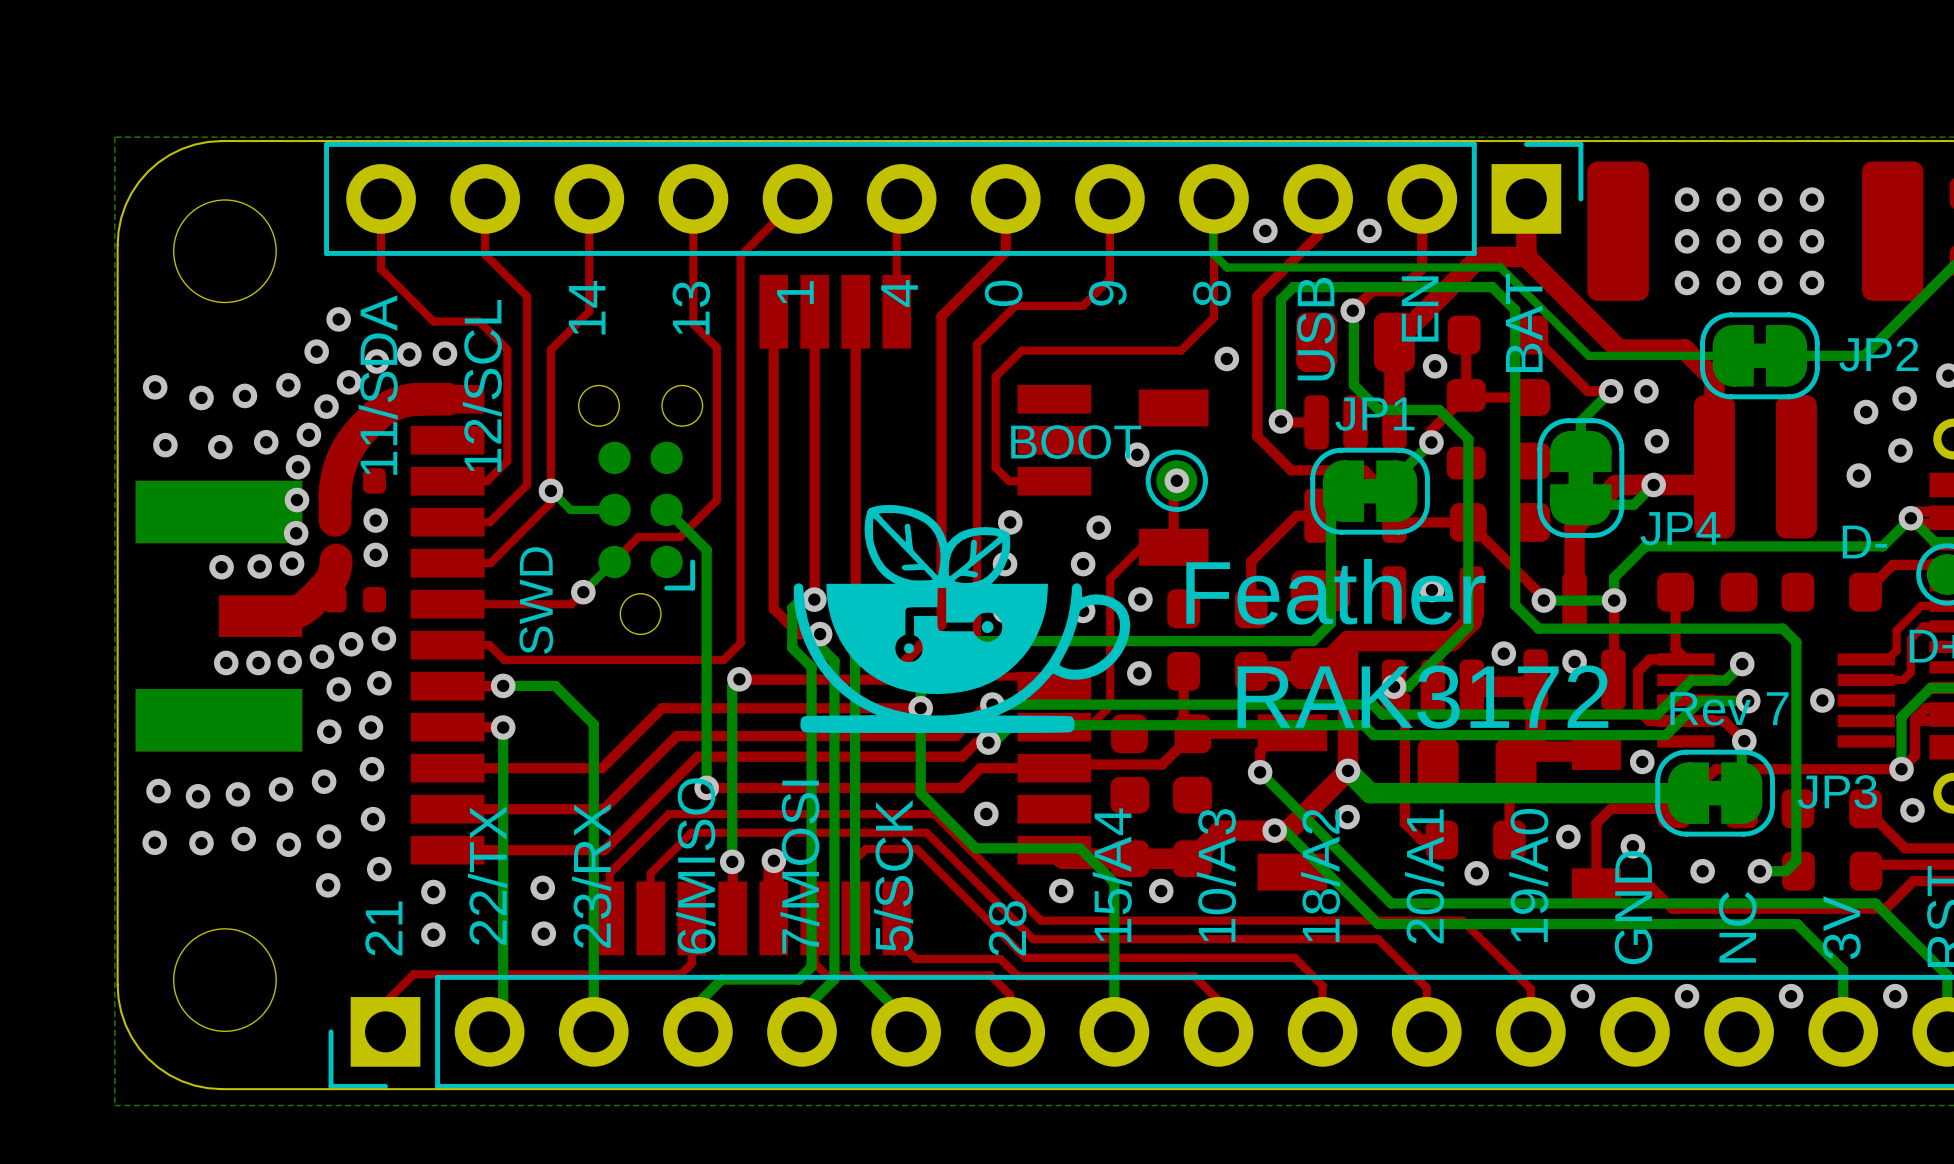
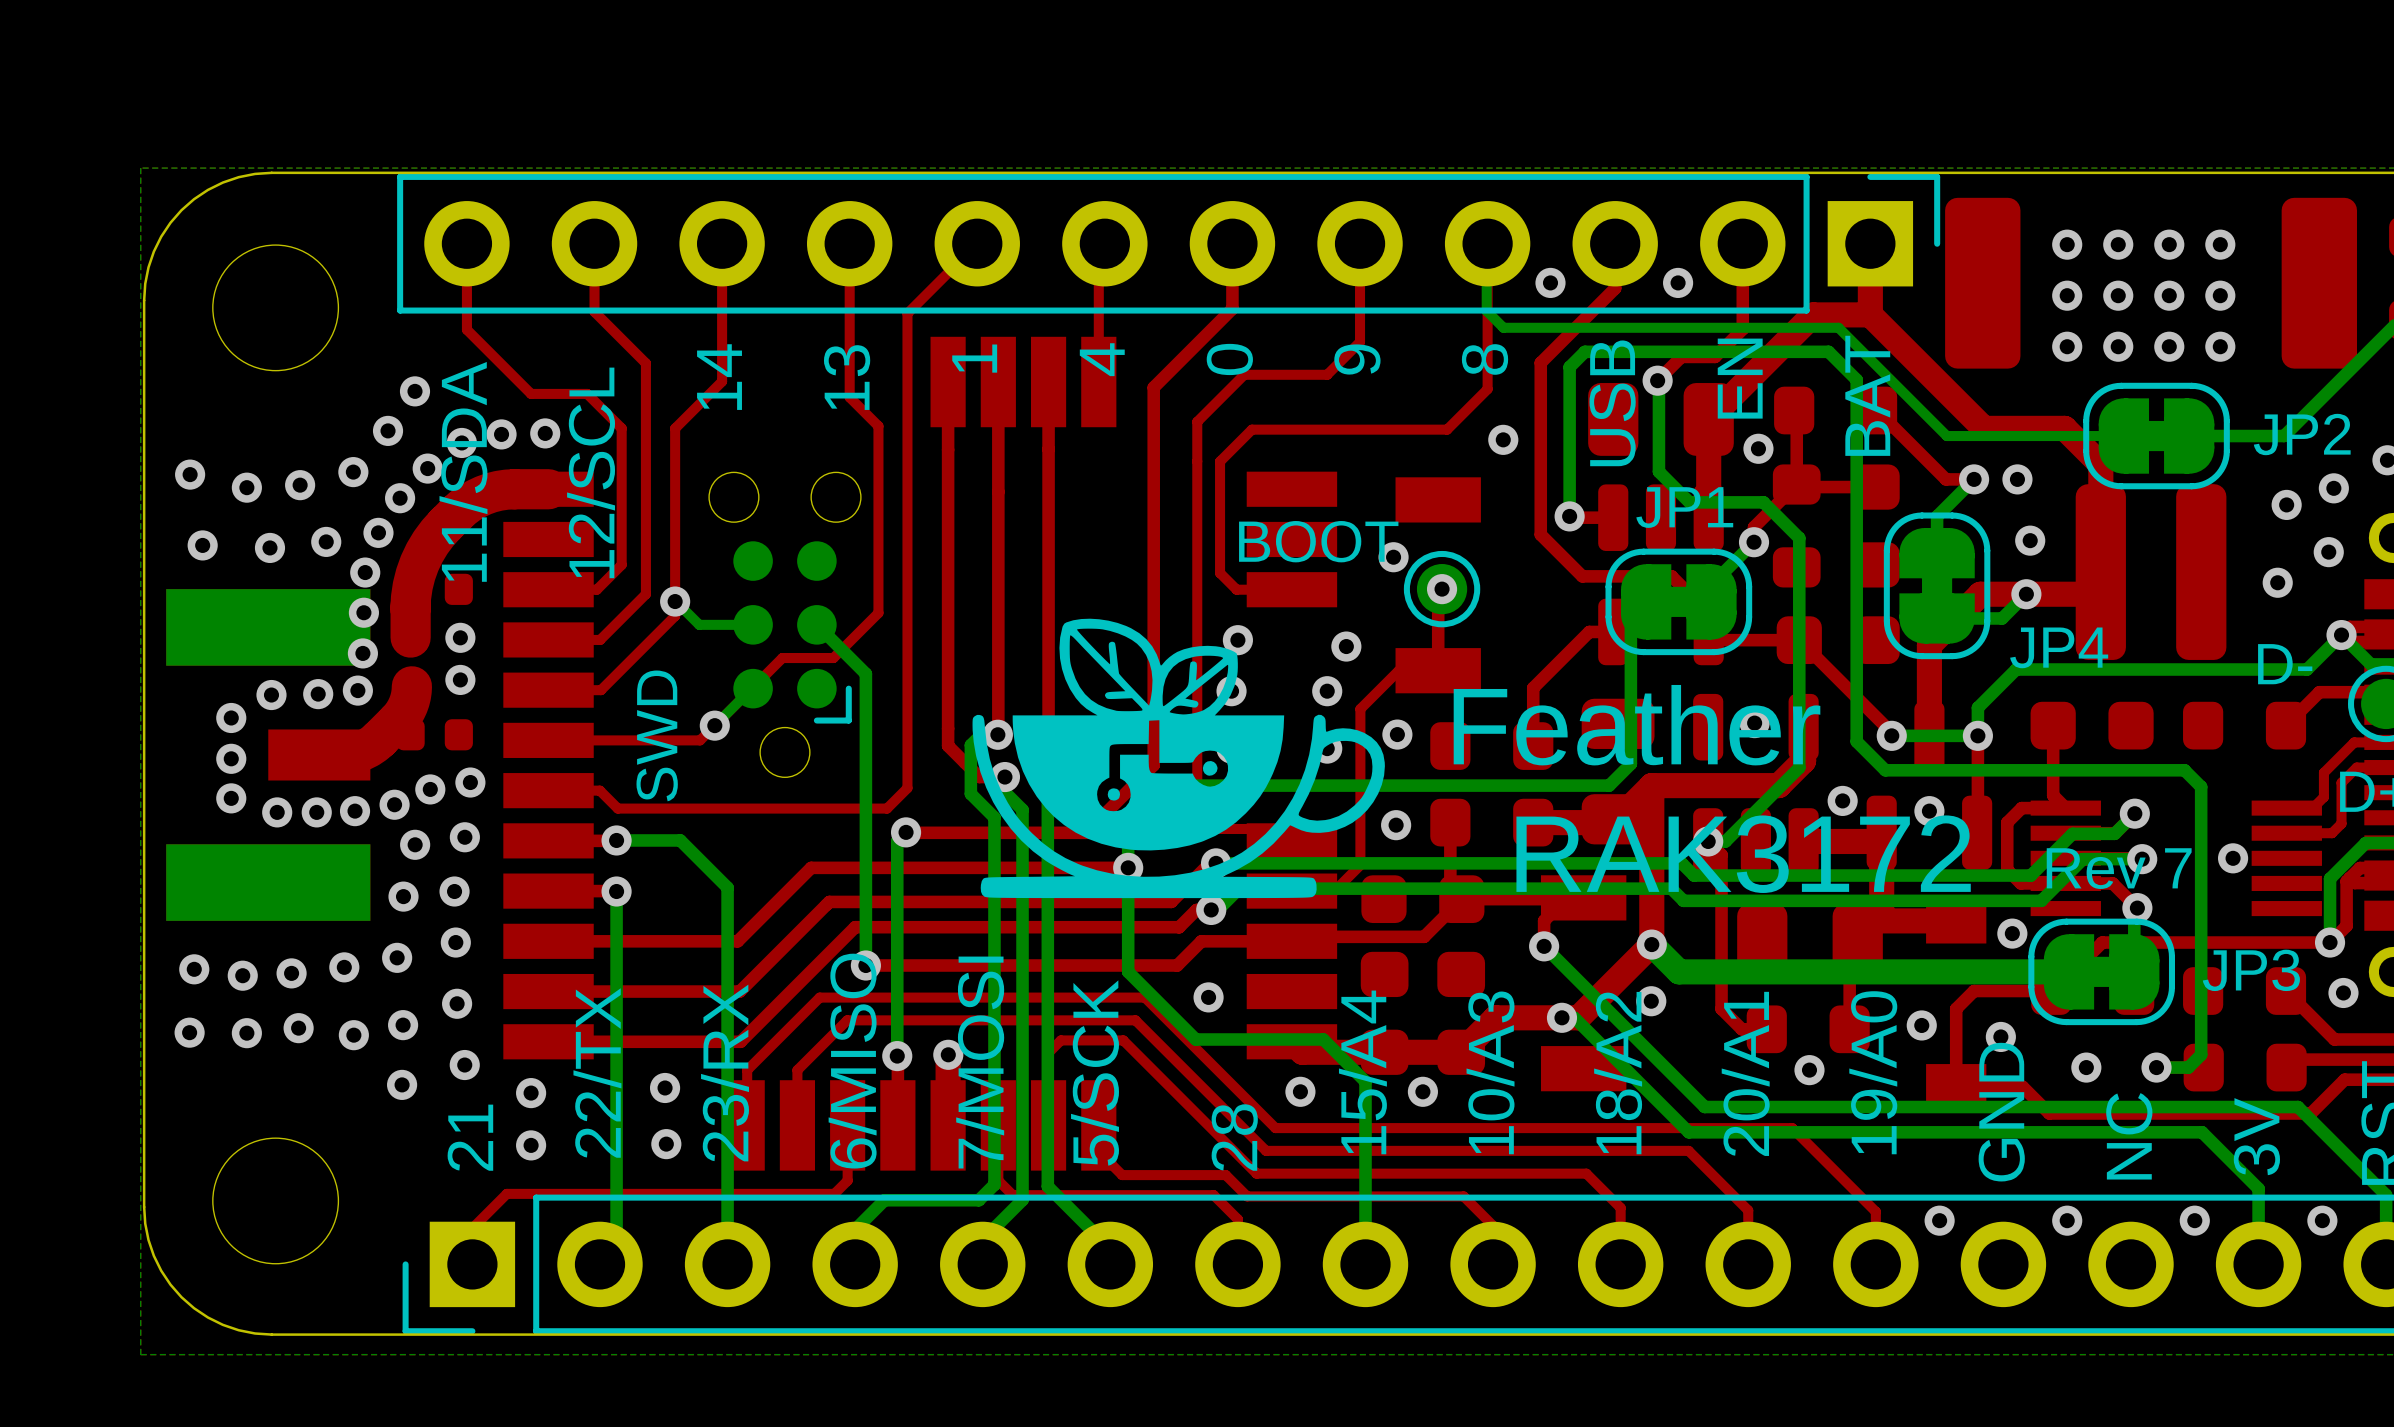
via: none -> (231, 717)
via: none -> (231, 758)
via: none -> (231, 798)

